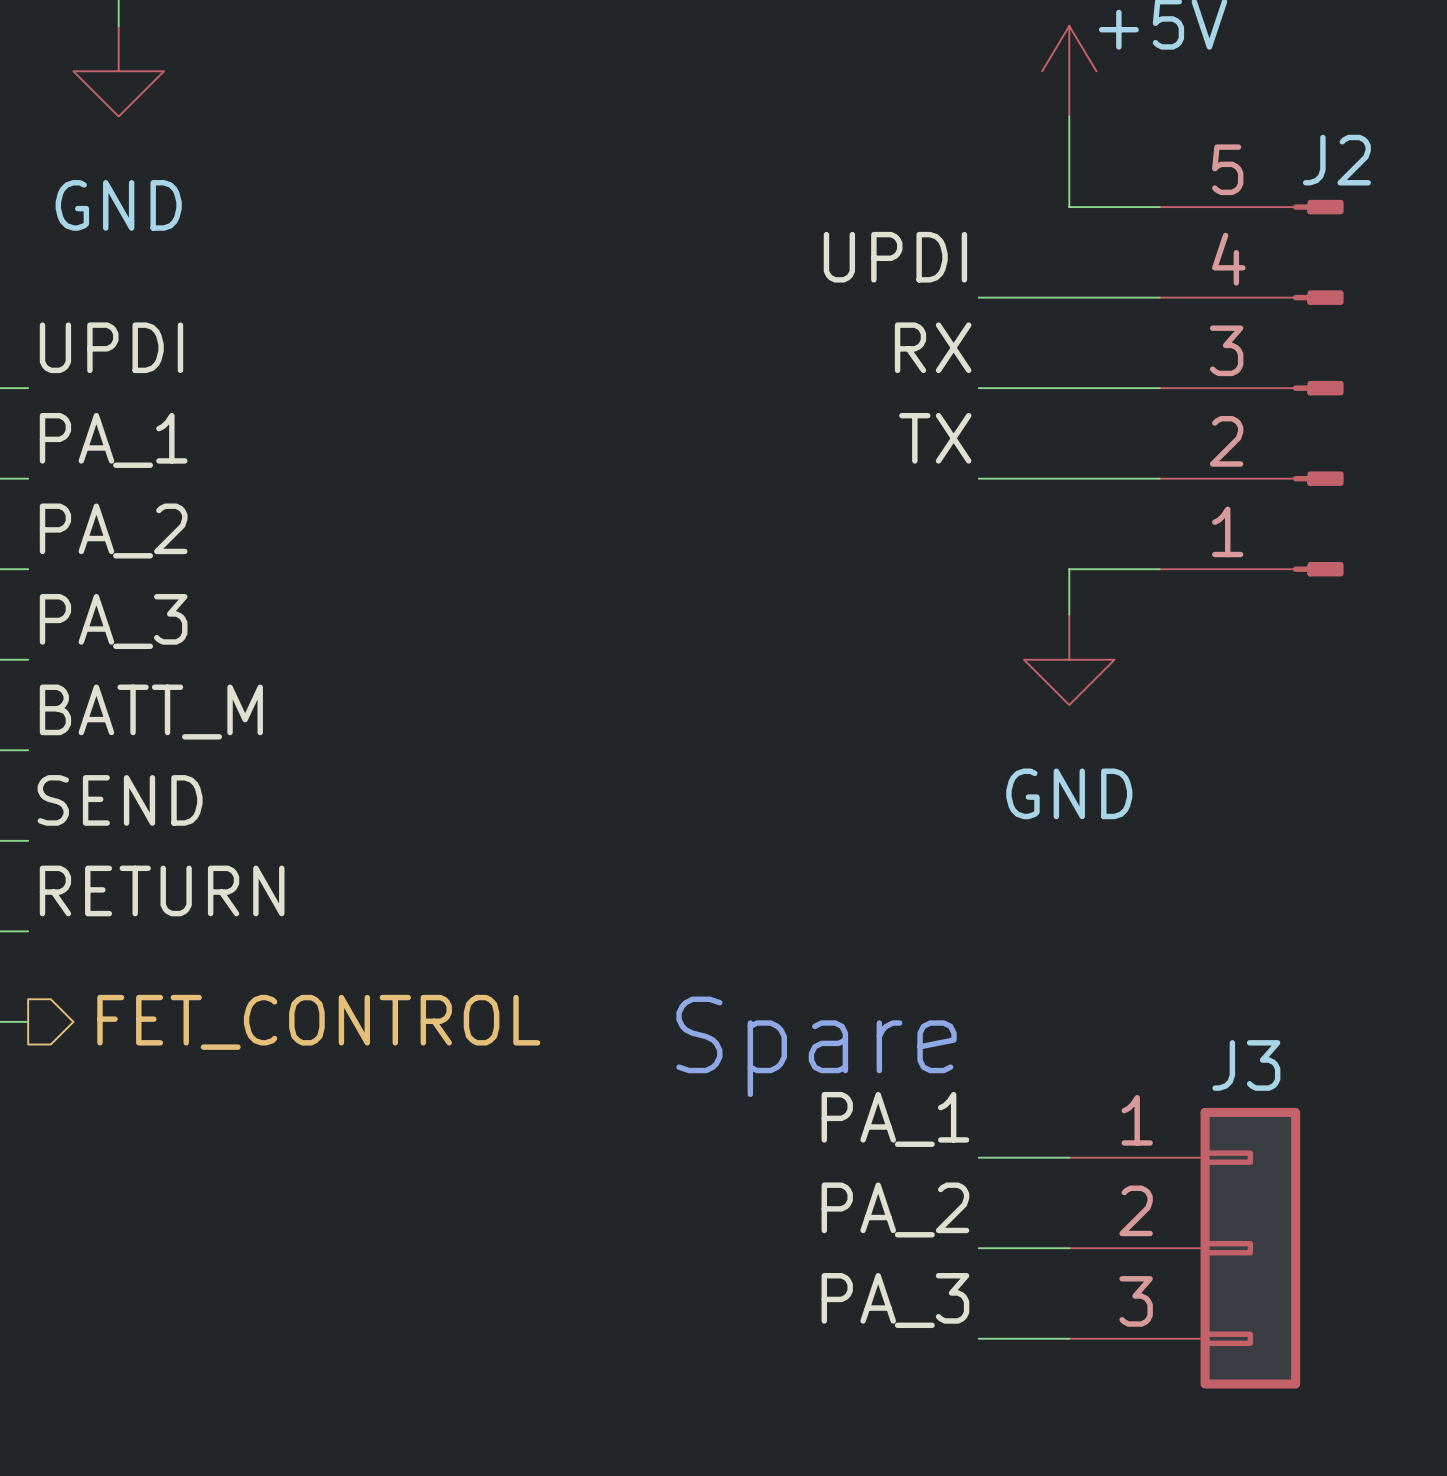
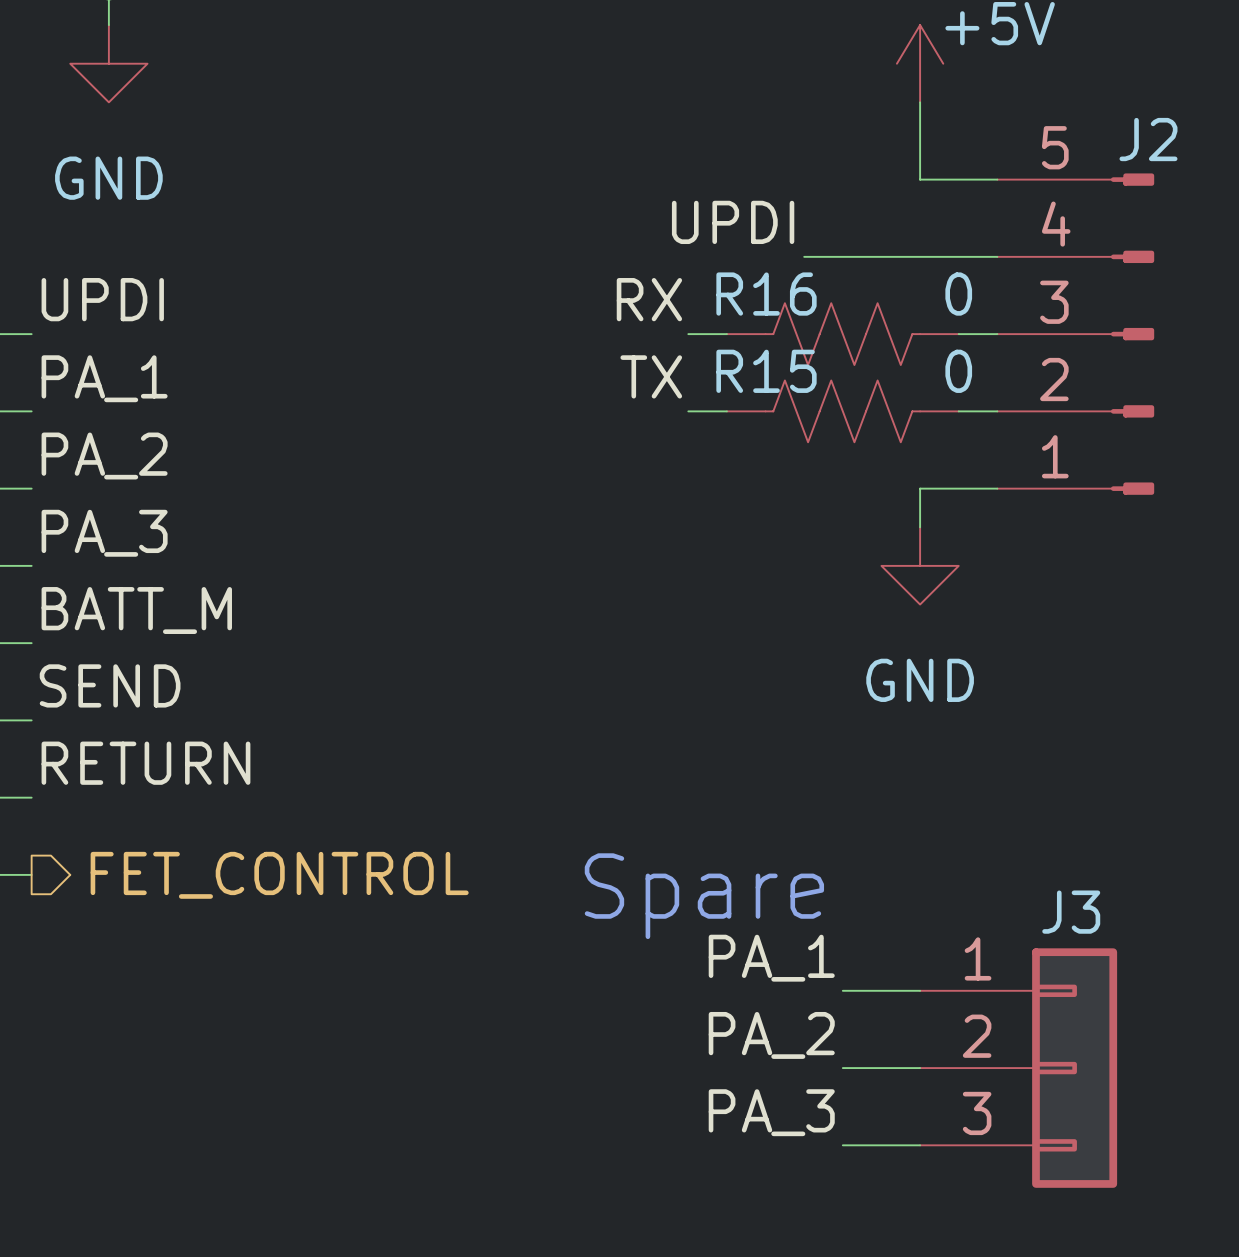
label position: UPDI (895, 257) -> UPDI (733, 222)
wire: none -> (804, 256) (842, 256)
label position: RX (933, 347) -> RX (649, 299)
wire: none -> (688, 334) (726, 334)
wire: (978, 388) (1114, 388) -> none
R15: none -> 0 (842, 334)
label position: TX (935, 438) -> TX (651, 376)
wire: none -> (688, 411) (726, 411)
wire: (978, 478) (1114, 478) -> none
R16: none -> 0 (842, 411)

